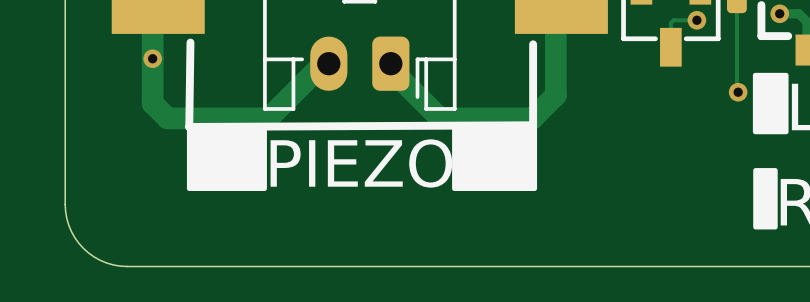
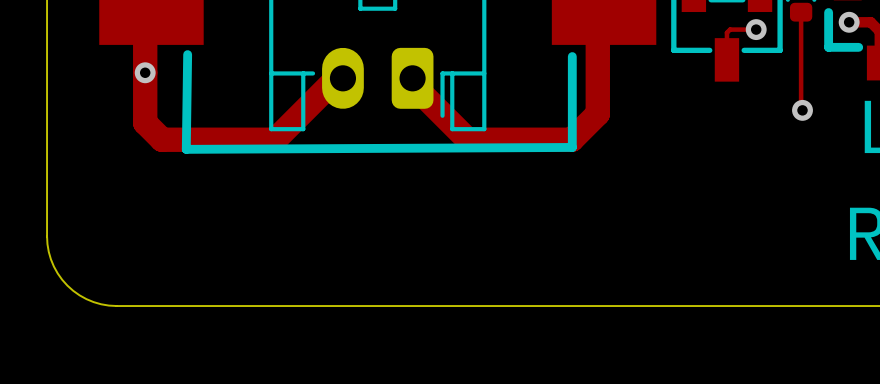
drawing: [752, 72, 789, 230] -> none
drawing: [452, 122, 538, 192] -> none
drawing: [186, 124, 267, 192] -> none
text: PIEZO (361, 163) -> none

